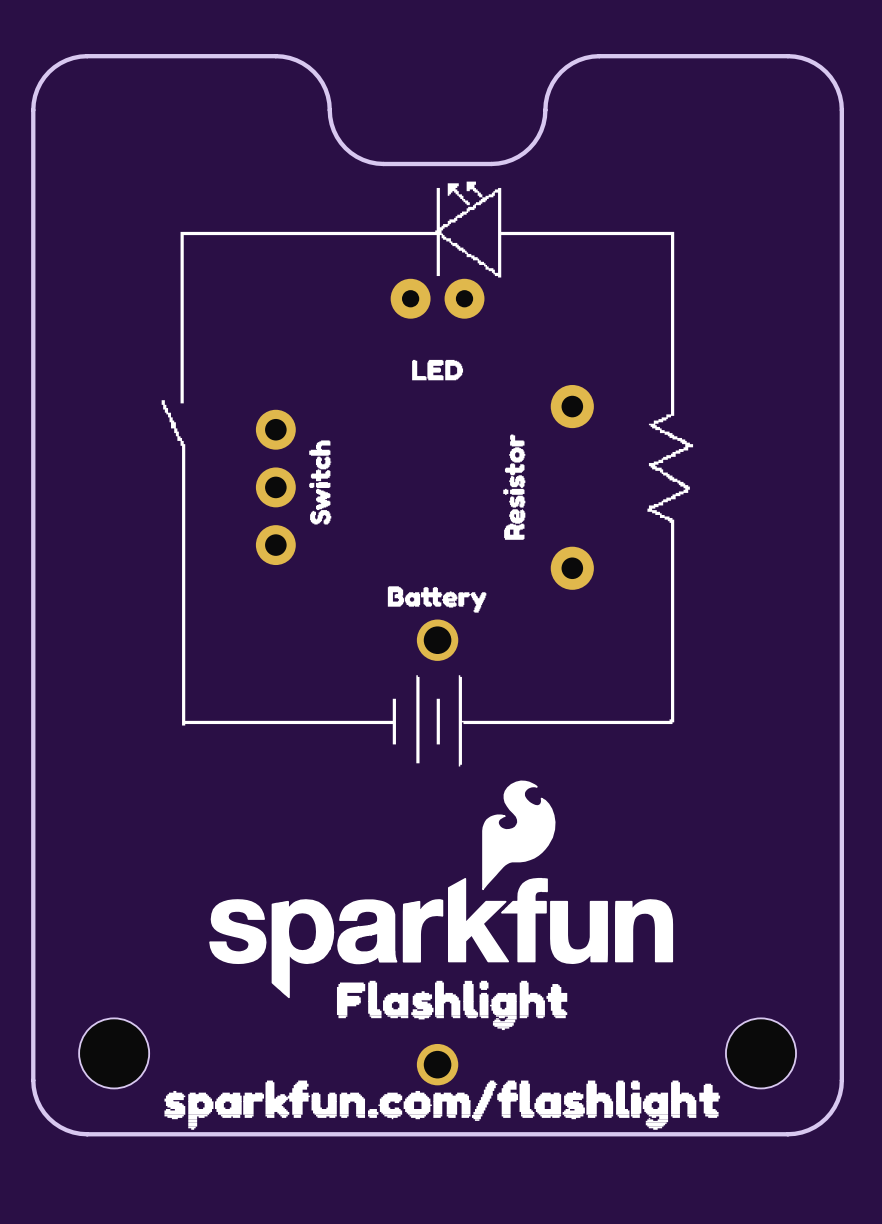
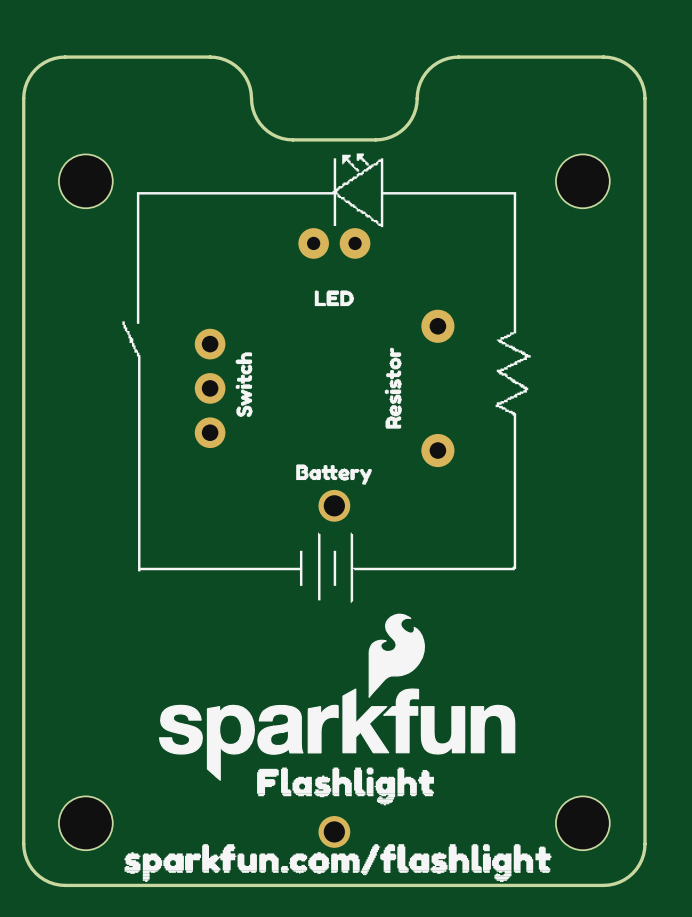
part: none -> (85, 181)
part: none -> (582, 181)

